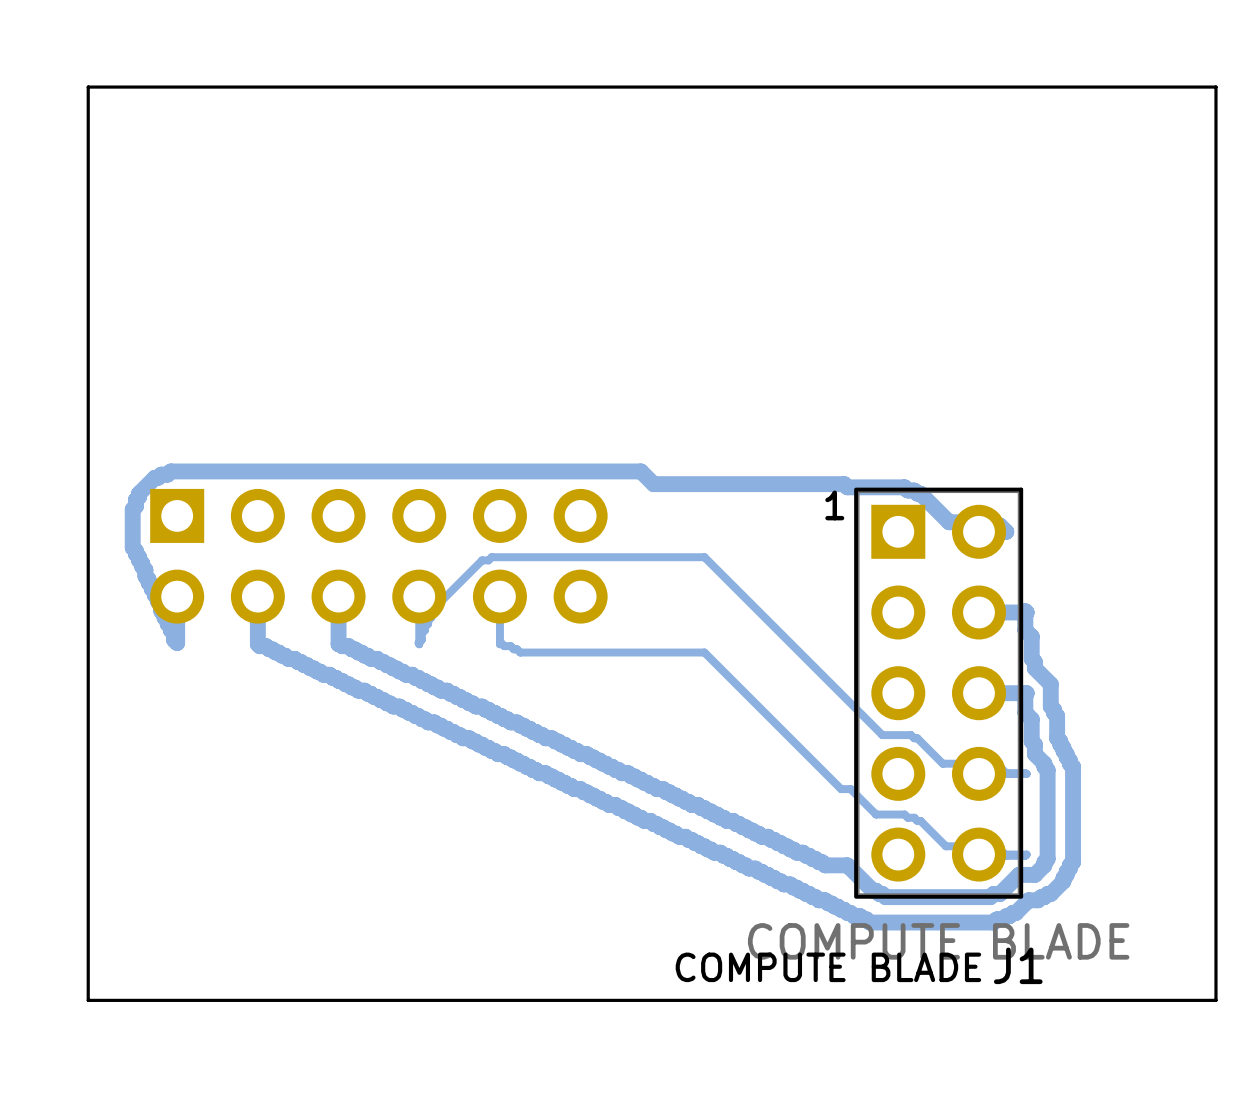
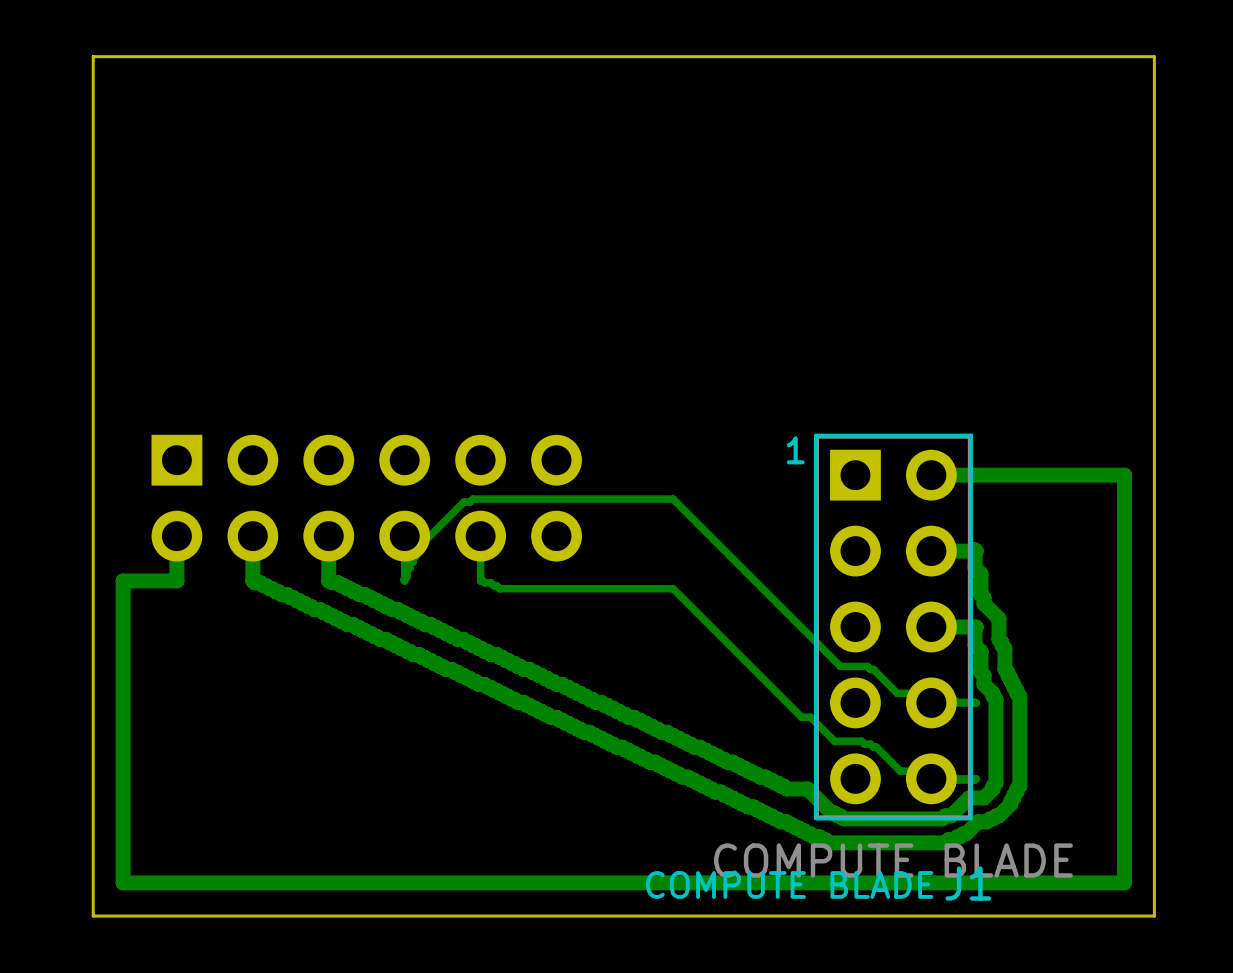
track: (1006, 531) (999, 525) (977, 525) (974, 522) (949, 522) (920, 493) (914, 490) (907, 490) (904, 487) (847, 487) (844, 484) (653, 484) (640, 471) (170, 471) (167, 474) (161, 474) (154, 477) (139, 493) (135, 500) (135, 506) (132, 509) (132, 547) (145, 569) (145, 576) (161, 604) (161, 611) (177, 642) -> (957, 475) (1124, 475) (1124, 882) (123, 882) (123, 580) (176, 579)

